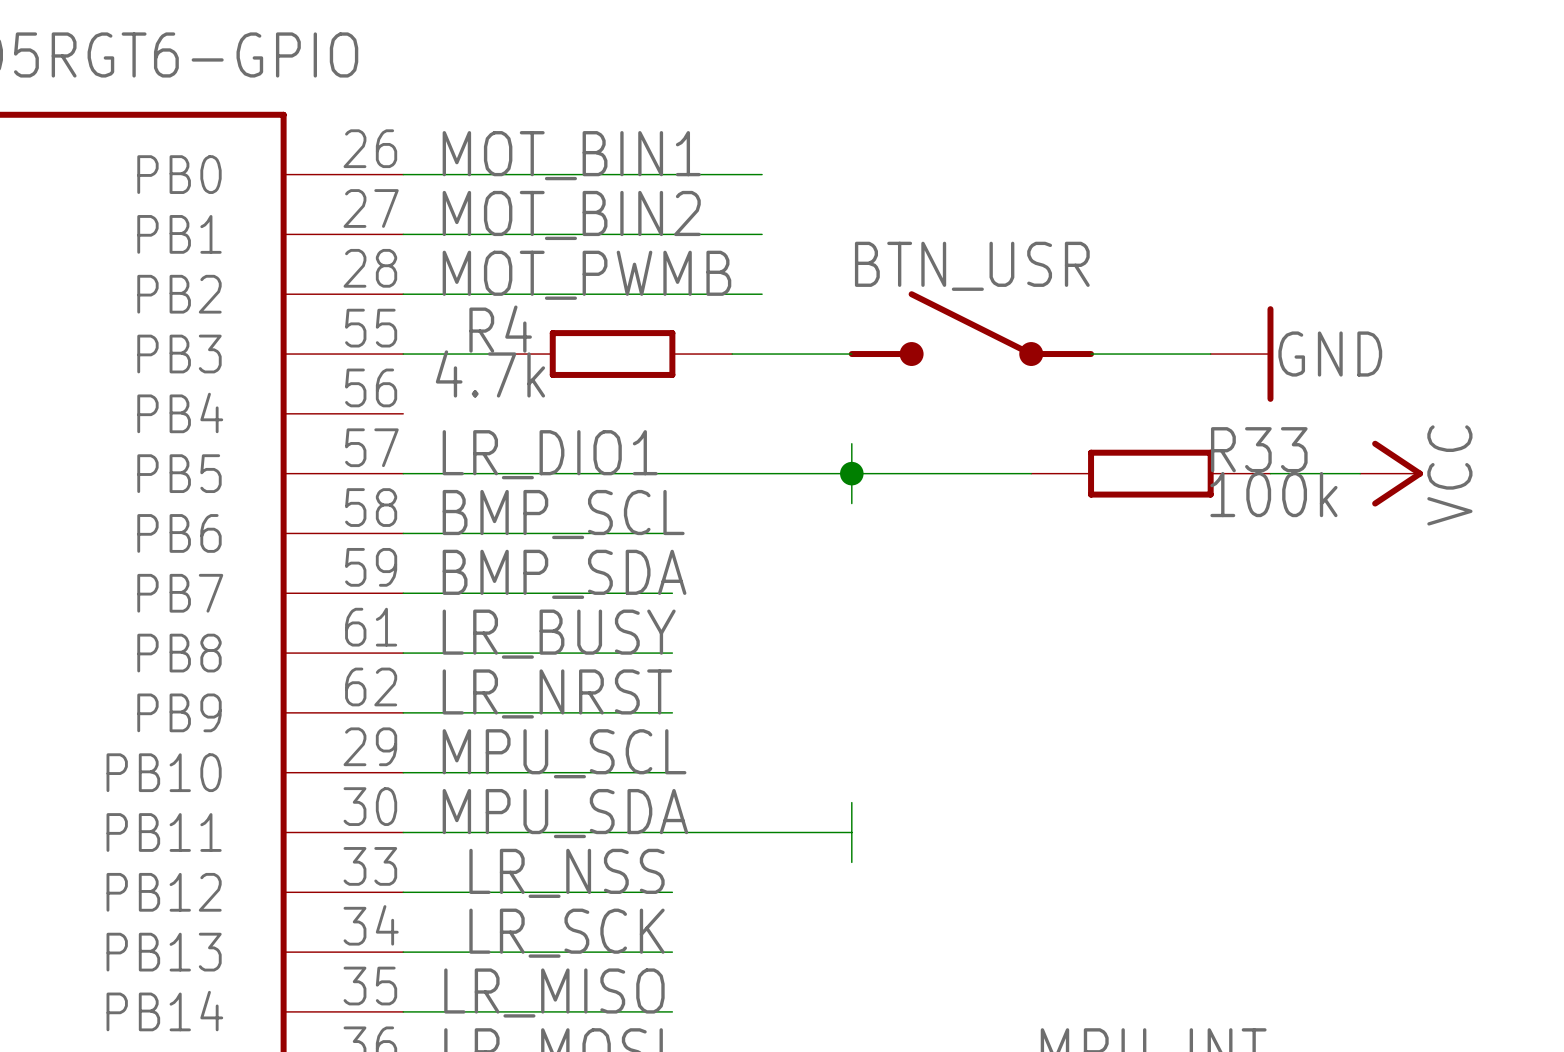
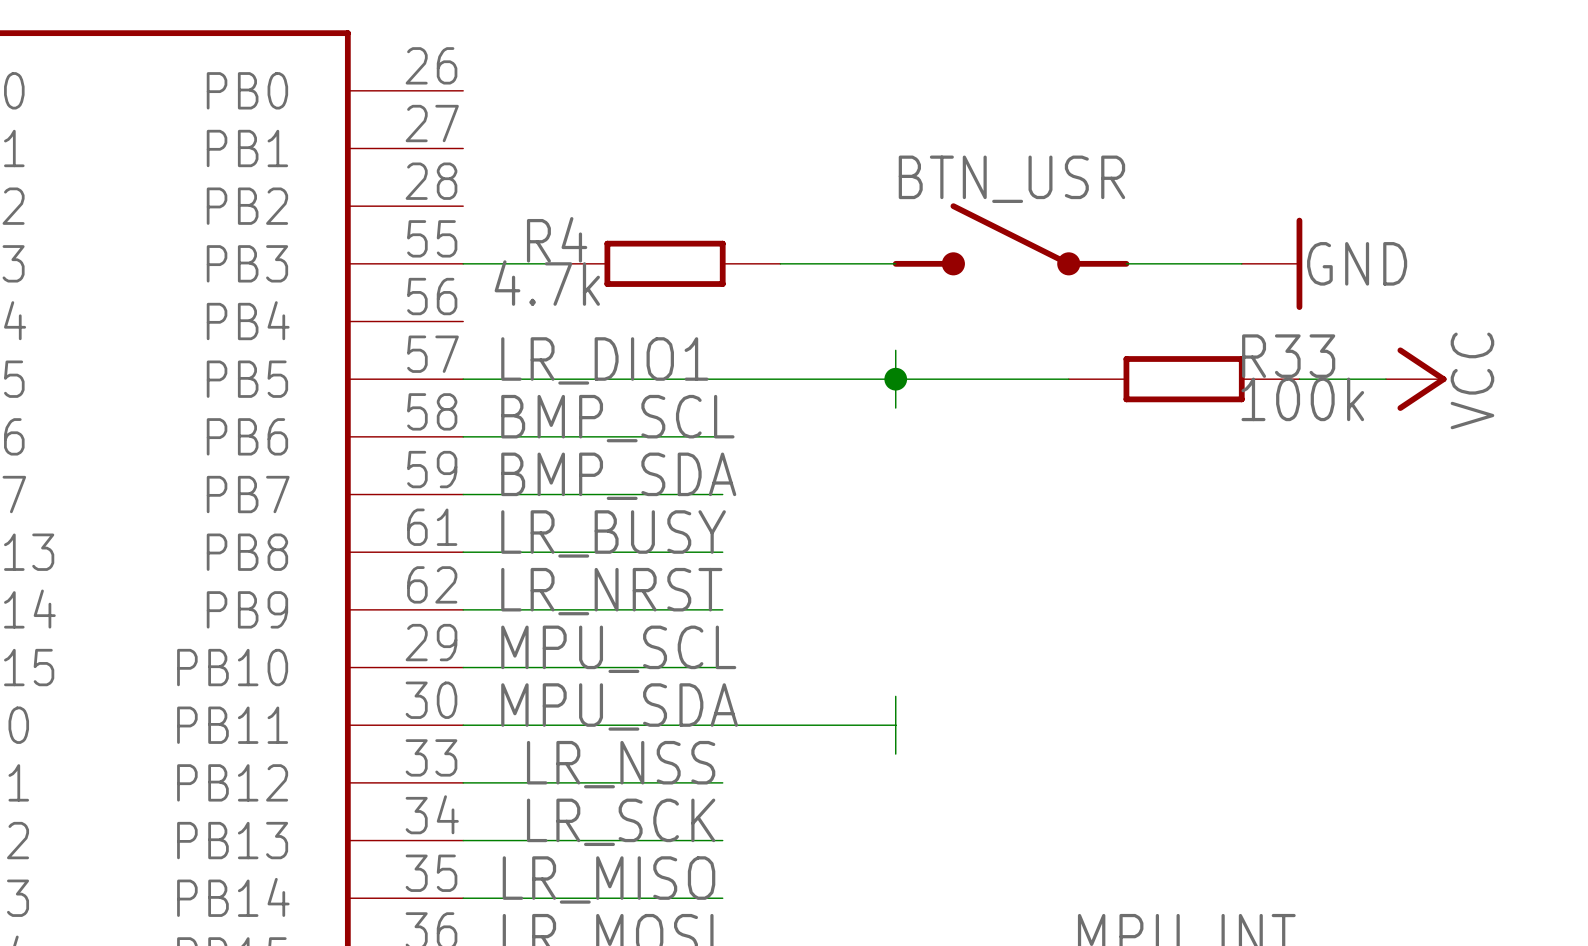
label: MOT_BIN1 (571, 155) -> none
wire: (403, 174) (762, 174) -> none
label: MOT_BIN2 (571, 215) -> none
wire: (403, 234) (762, 234) -> none
label: MOT_PWMB (586, 275) -> none
wire: (403, 294) (762, 294) -> none

